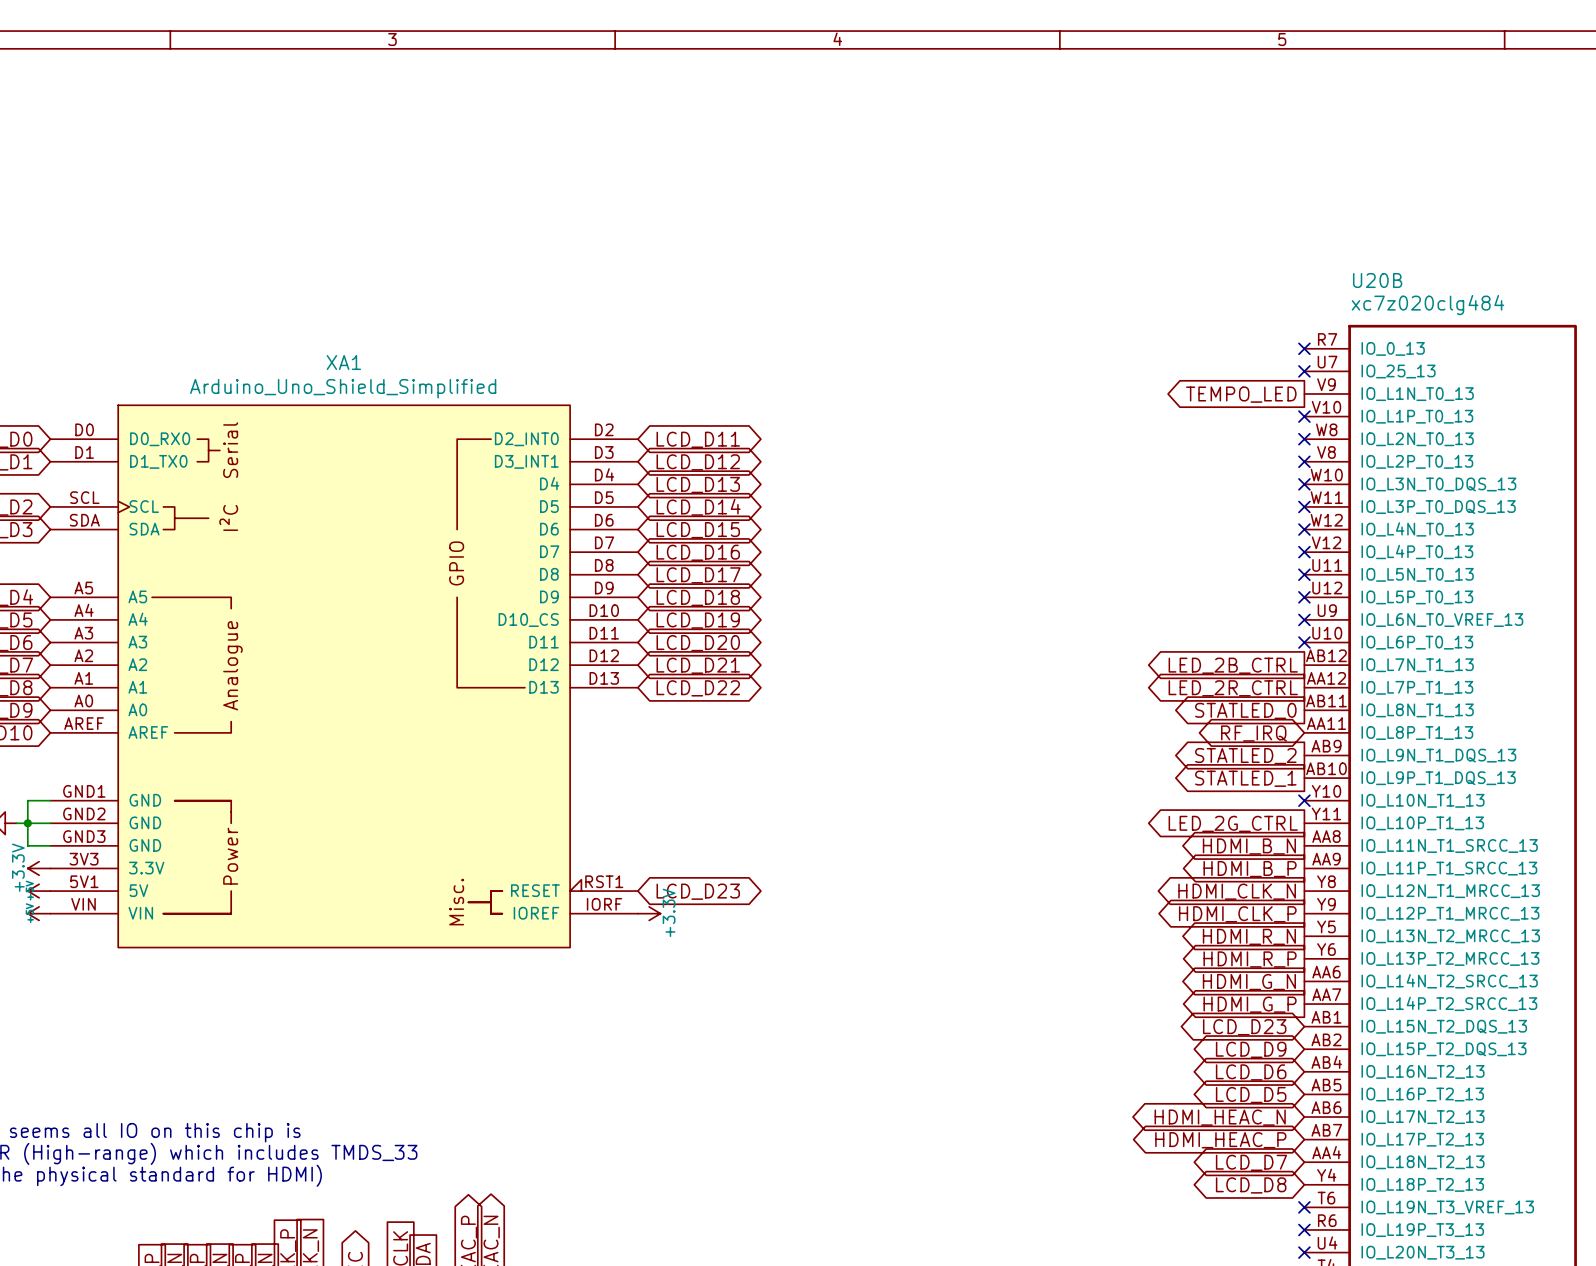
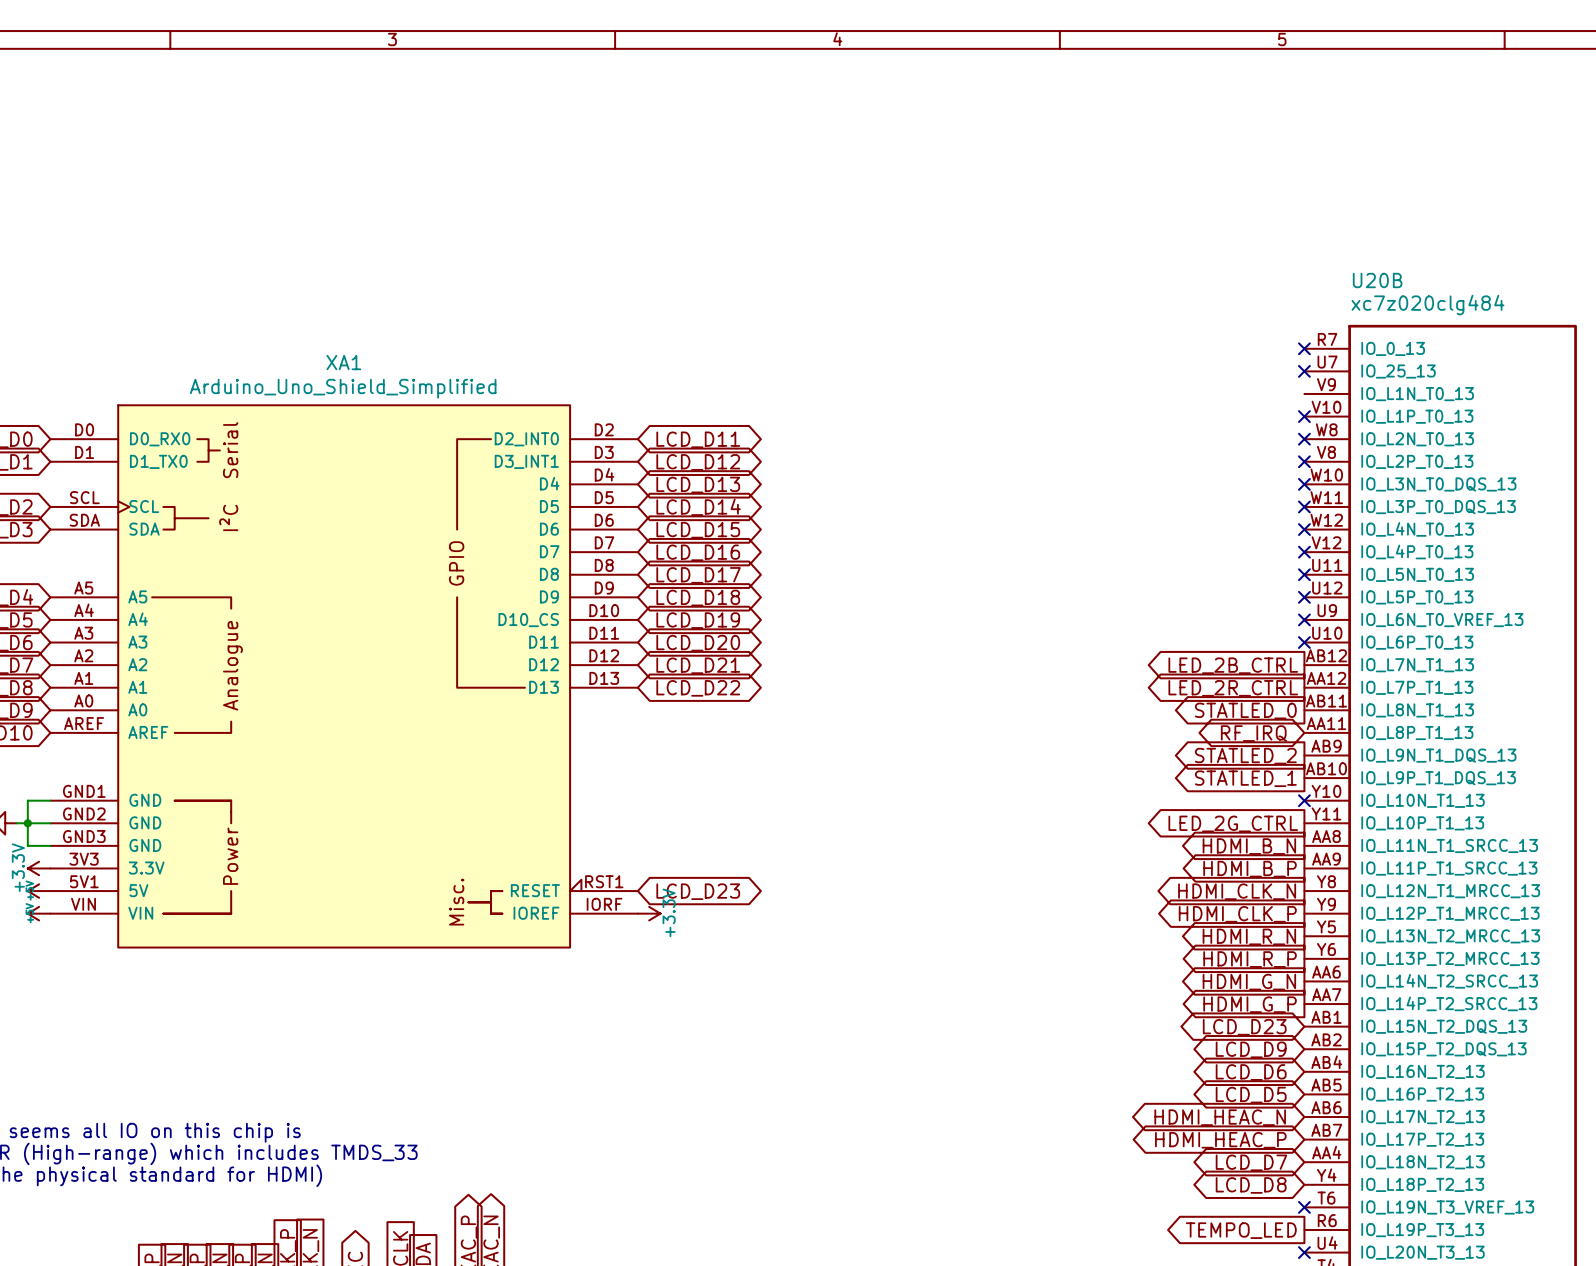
global label: TEMPO_LED (1241, 394) -> none
no-connect mark: (1304, 1229) -> none
global label: none -> TEMPO_LED (1241, 1230)

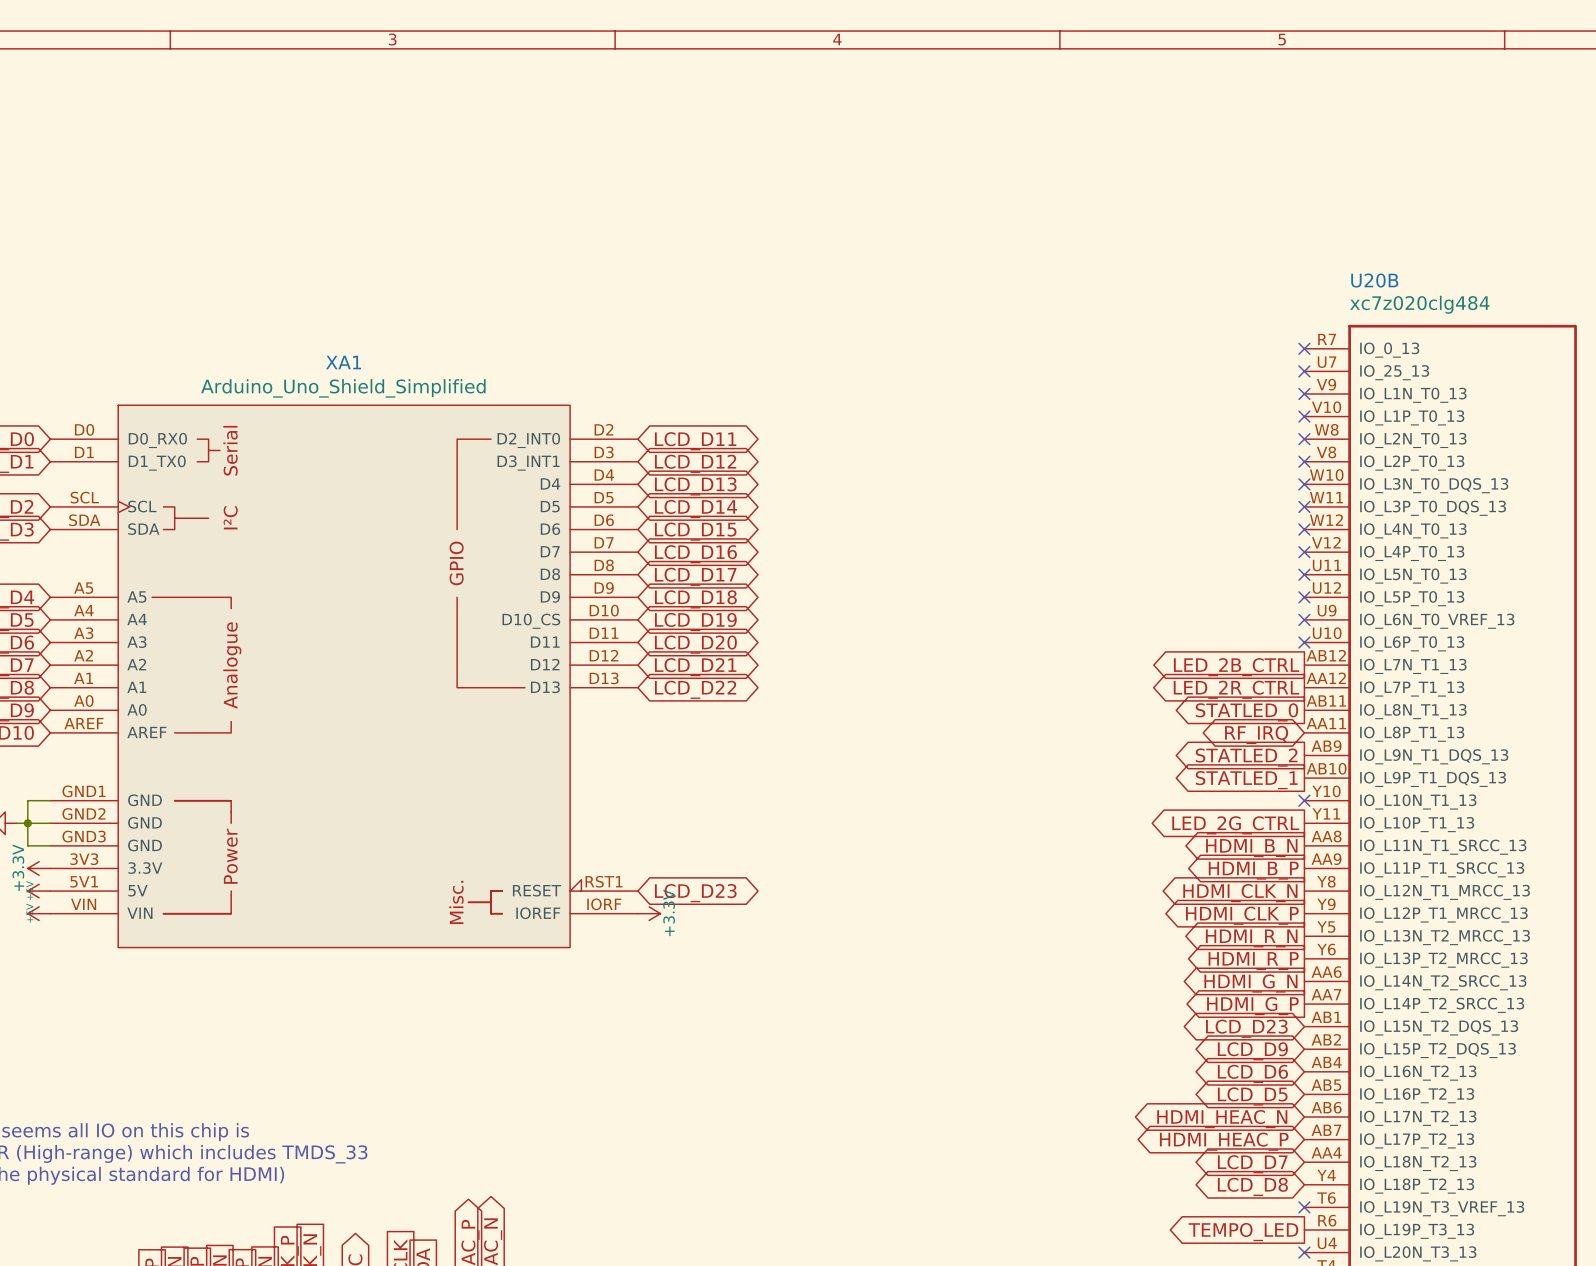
no-connect mark: none -> (1304, 393)

